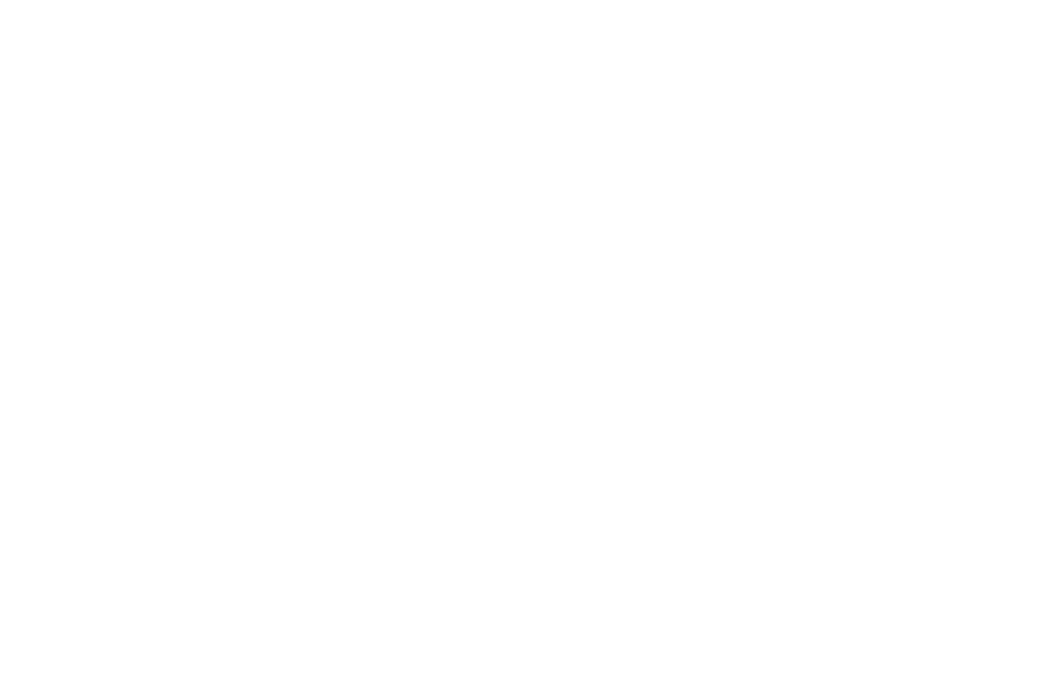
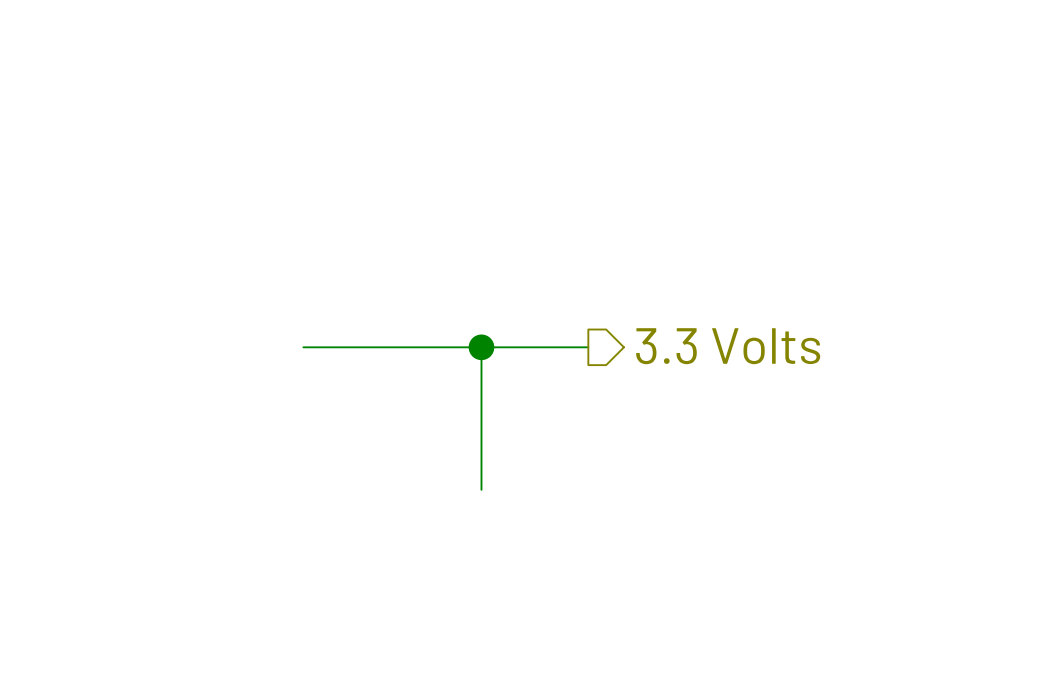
hierarchical label: none -> 3.3 Volts (728, 346)
wire: none -> (303, 347) (588, 347)
wire: none -> (481, 347) (481, 489)
junction: none -> (481, 347)

